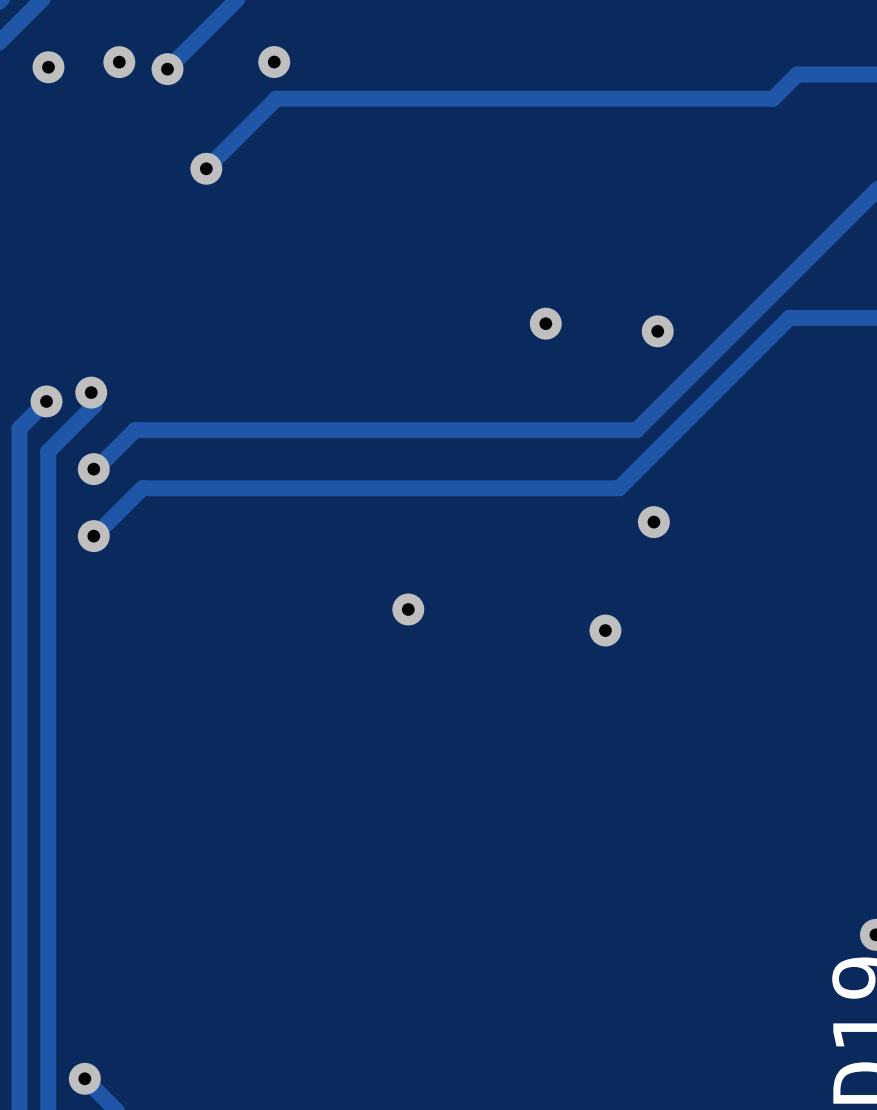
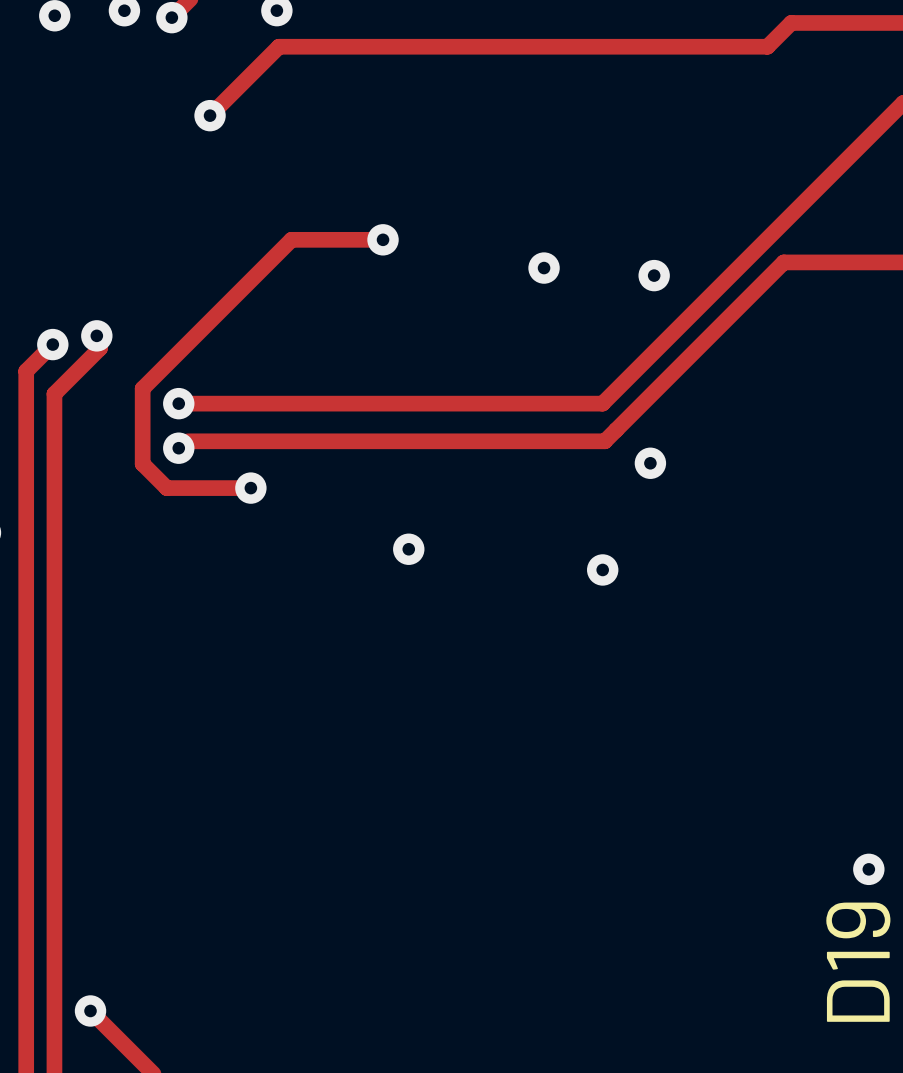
track: none -> (383, 239) (291, 239) (142, 388) (142, 463) (166, 488) (250, 488)
via: none -> (383, 239)
track: (636, 430) (135, 430) (94, 470) -> (633, 372) (602, 403) (178, 403)
via: none -> (178, 403)
via: (93, 469) -> none
track: (619, 488) (142, 488) (94, 536) -> (616, 430) (604, 441) (187, 441)
via: none -> (178, 448)
via: (93, 536) -> none
via: none -> (250, 488)

